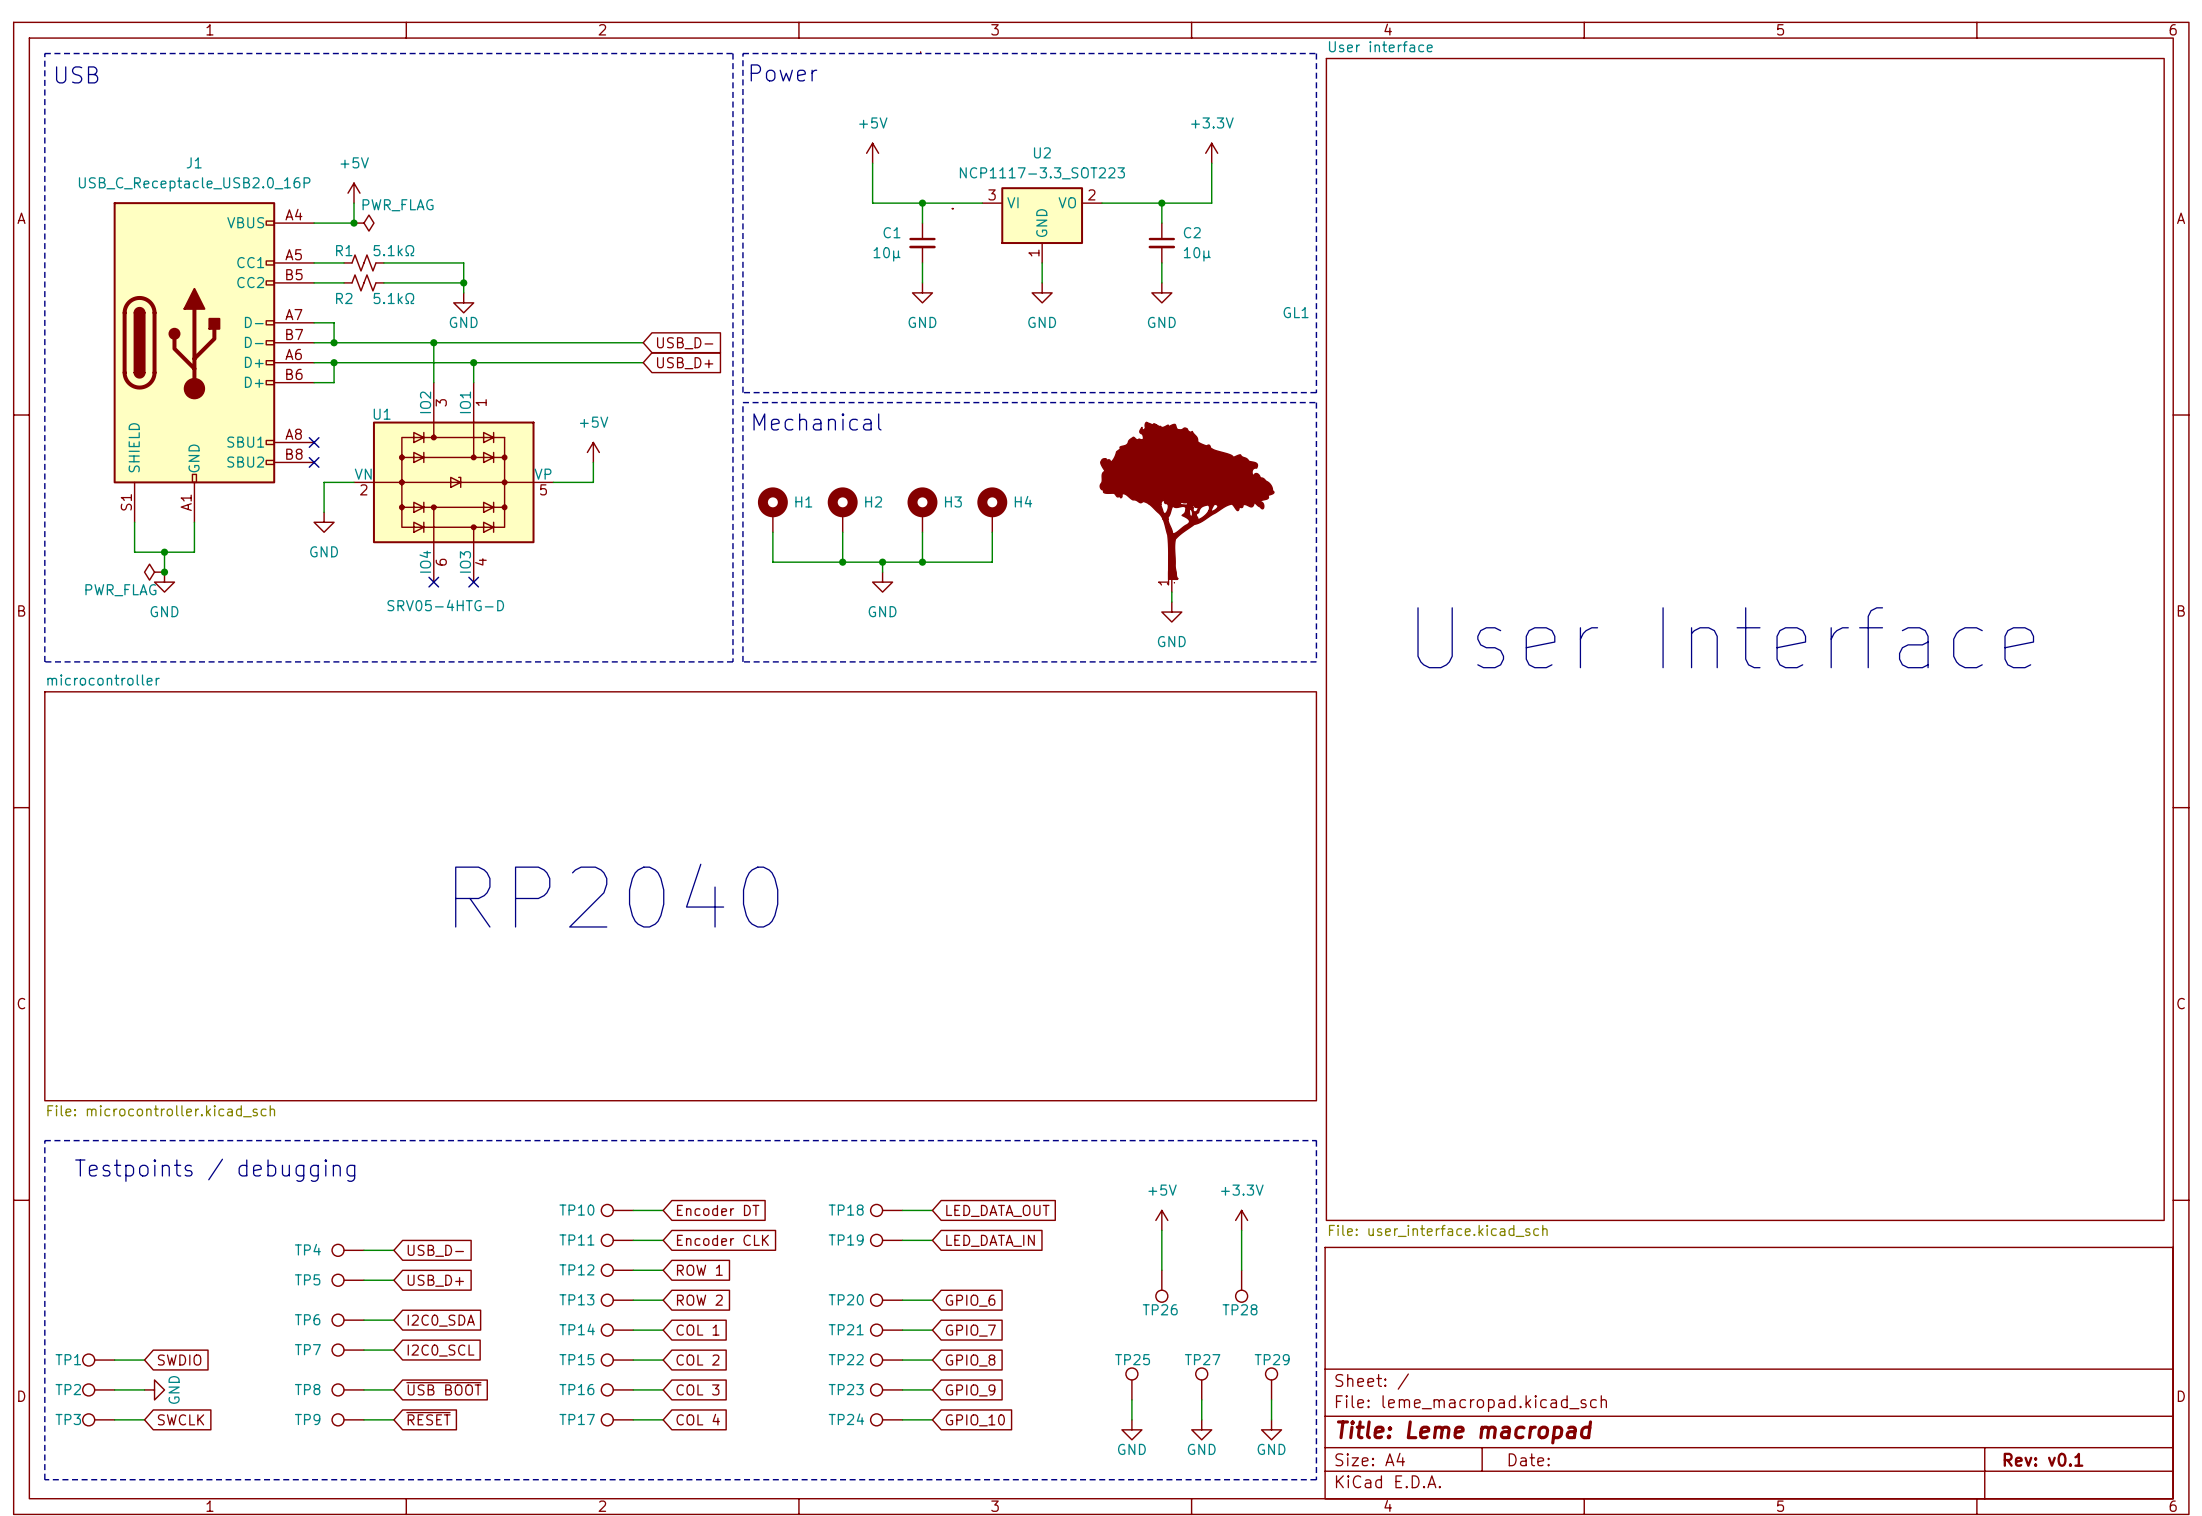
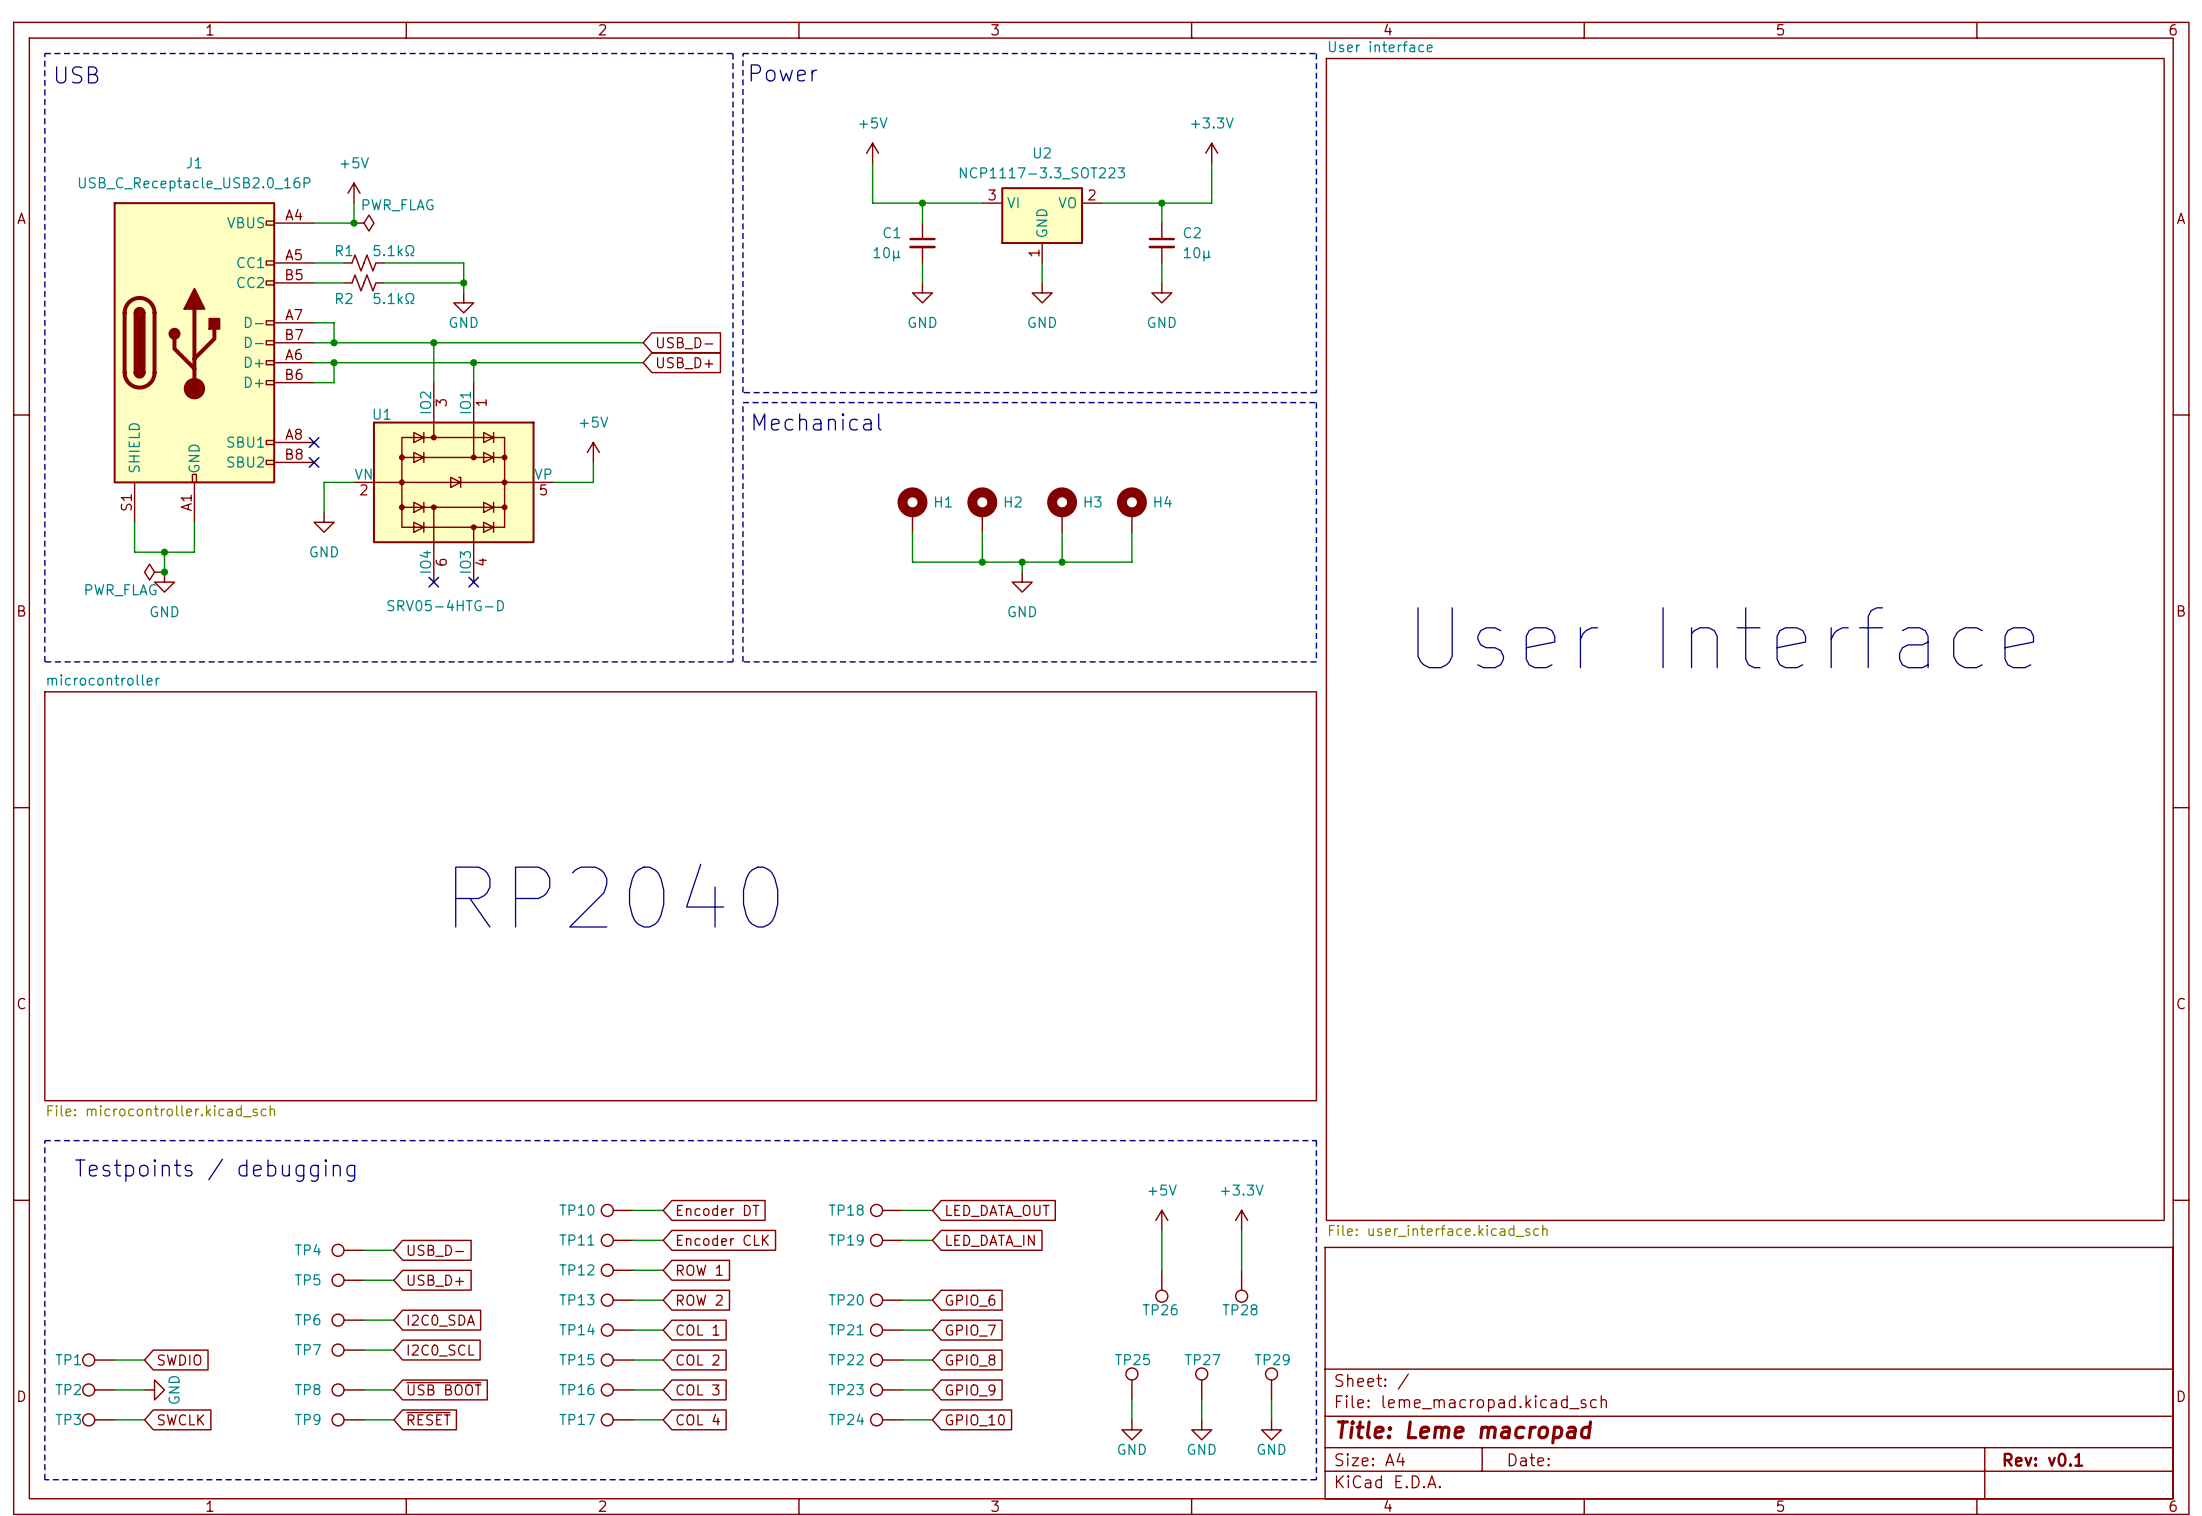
GL1: (1097, 322) -> none
H1 position: (772, 509) -> (912, 509)
H2 position: (842, 509) -> (982, 509)
H3 position: (922, 509) -> (1062, 509)
H4 position: (992, 509) -> (1131, 509)
wire: (772, 532) (772, 562) (912, 562) -> (912, 532) (912, 562)
wire: (842, 532) (842, 562) -> (982, 532) (982, 562)
wire: (922, 532) (922, 562) -> (1062, 532) (1062, 562)
wire: (992, 532) (992, 562) -> (1131, 532) (1131, 562) (992, 562)
junction: (842, 562) -> none
wire: (882, 562) (882, 572) -> (1022, 562) (1022, 572)
junction: (882, 562) -> none
junction: (922, 562) -> none
junction: none -> (982, 562)
junction: none -> (1022, 562)
junction: none -> (1062, 562)
power symbol: GND (882, 582) -> none
power symbol: none -> GND (1022, 582)
wire: (1171, 592) (1171, 602) -> none
power symbol: GND (1171, 612) -> none

